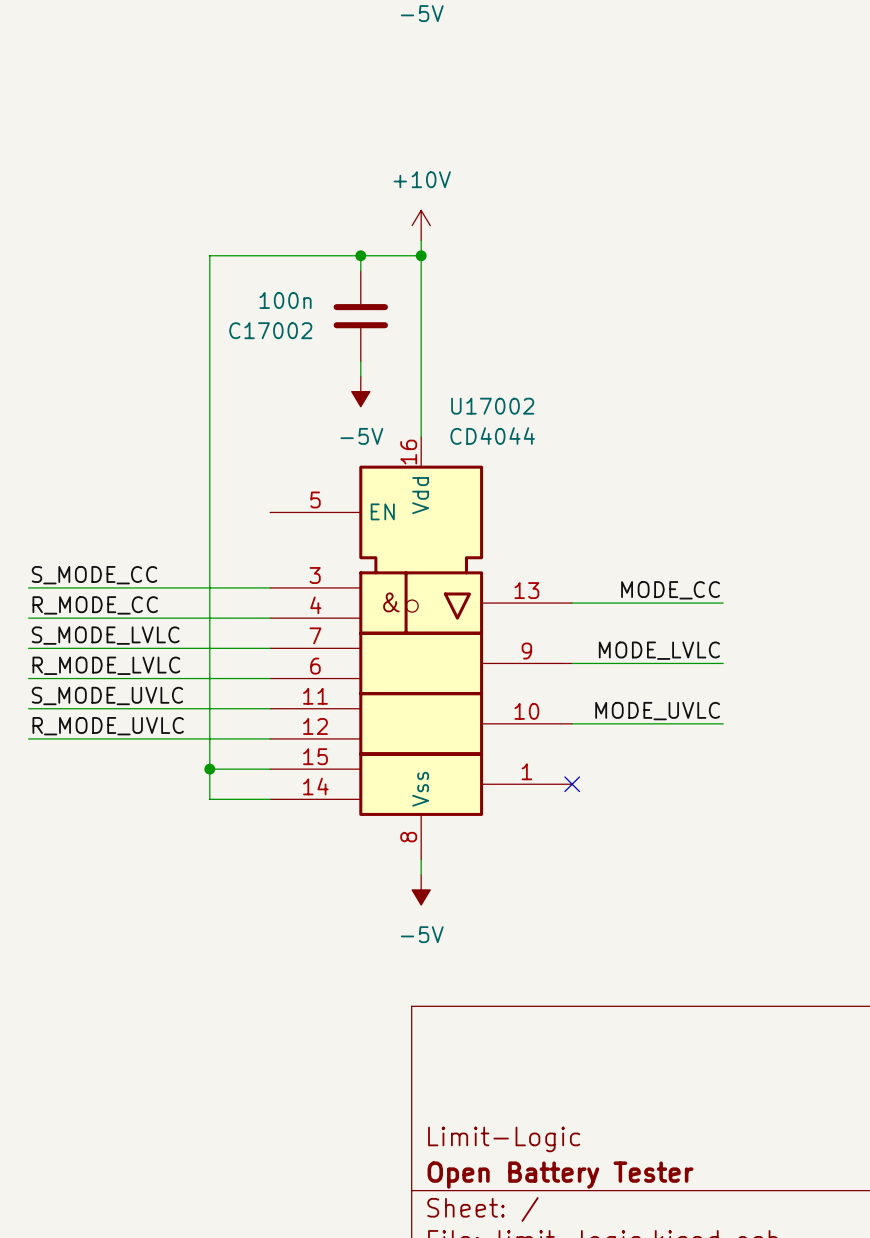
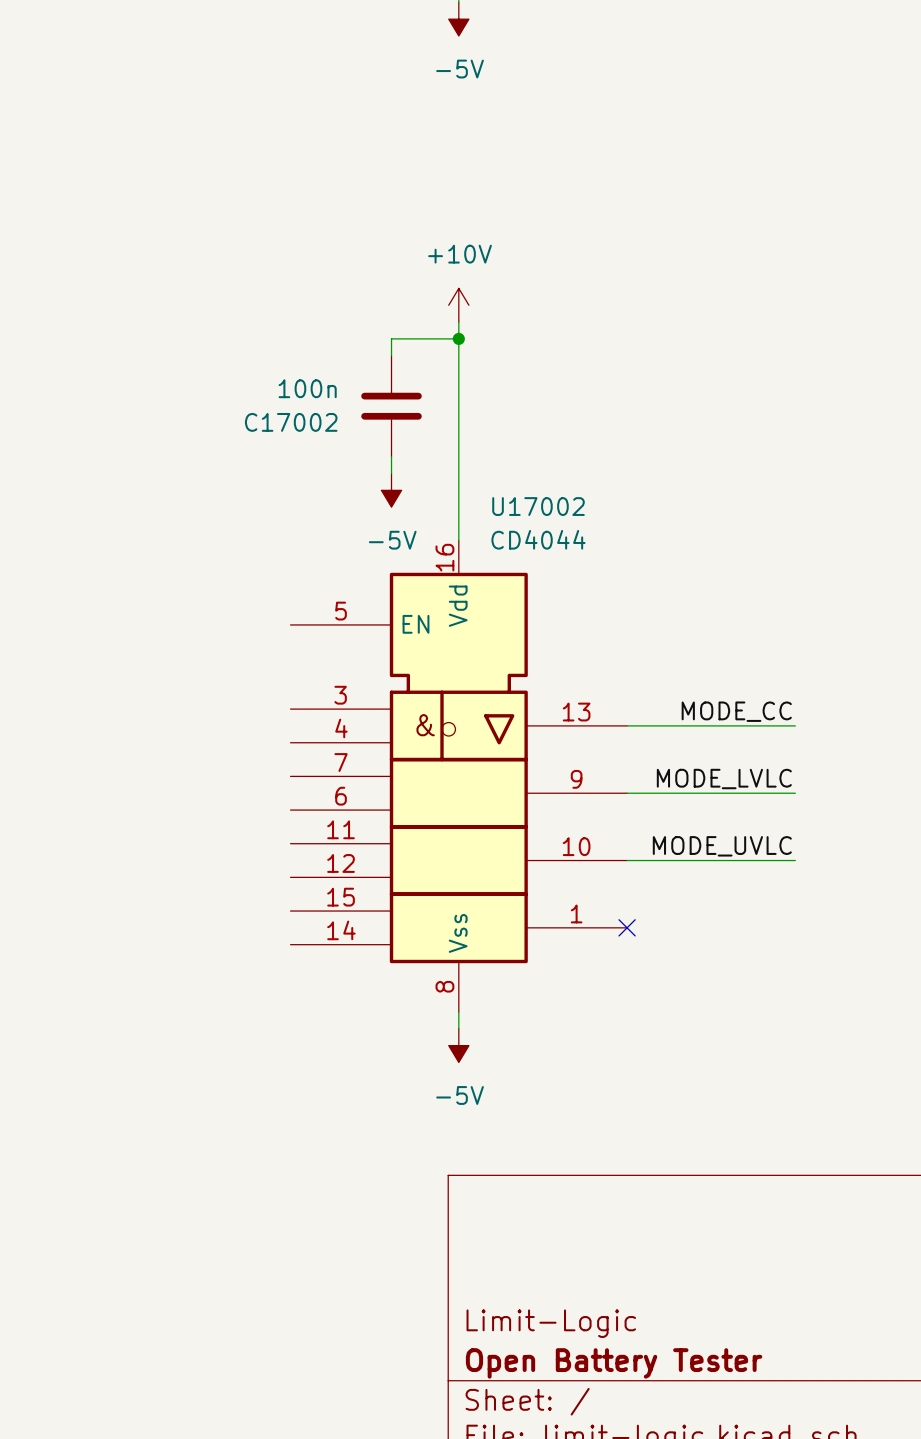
wire: (360, 255) (209, 255) (209, 799) (270, 799) -> none
junction: (360, 255) -> none
label: S_MODE_CC (94, 575) -> none
wire: (28, 587) (270, 587) -> none
label: R_MODE_CC (95, 605) -> none
wire: (28, 618) (270, 618) -> none
label: S_MODE_LVLC (105, 635) -> none
wire: (28, 648) (270, 648) -> none
label: R_MODE_LVLC (106, 665) -> none
wire: (28, 678) (270, 678) -> none
label: S_MODE_UVLC (107, 695) -> none
wire: (28, 708) (270, 708) -> none
label: R_MODE_UVLC (108, 726) -> none
wire: (28, 738) (270, 738) -> none
wire: (209, 769) (270, 769) -> none
junction: (209, 769) -> none

